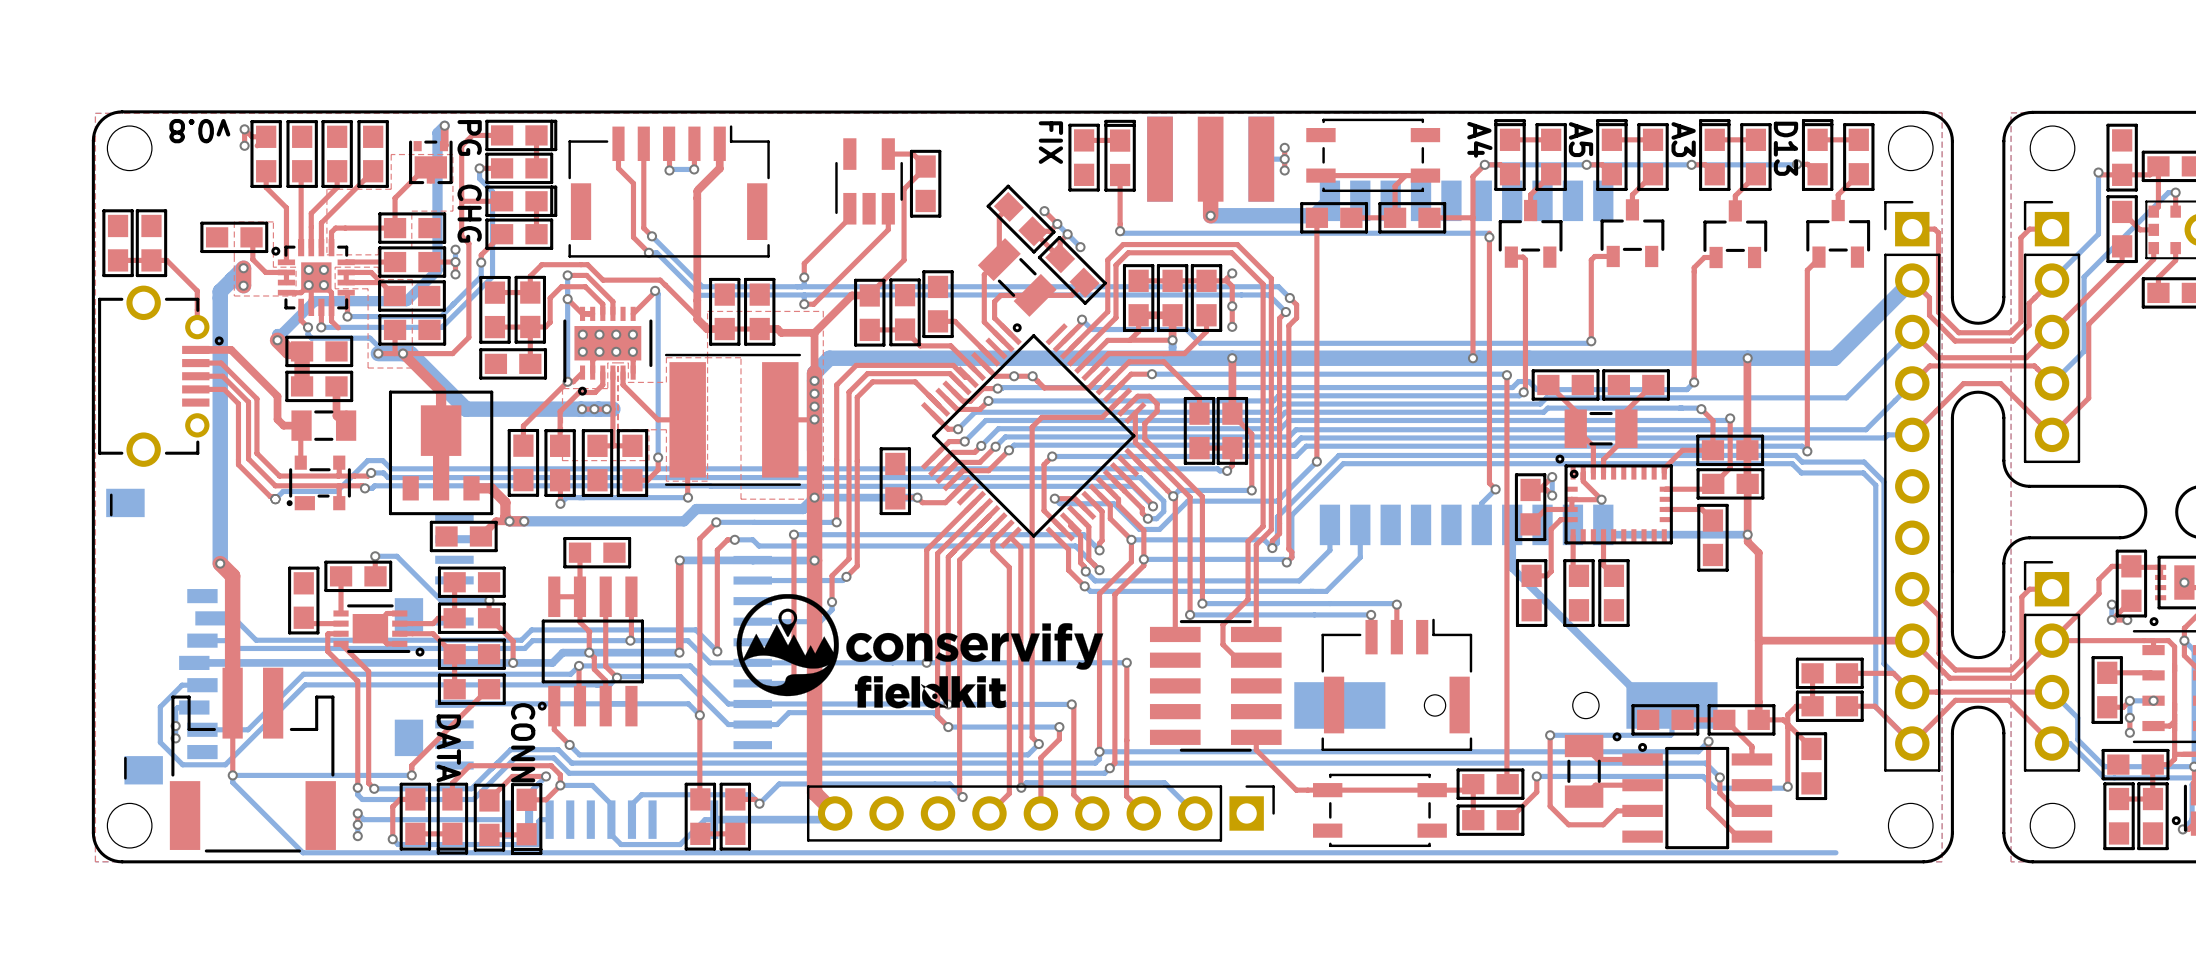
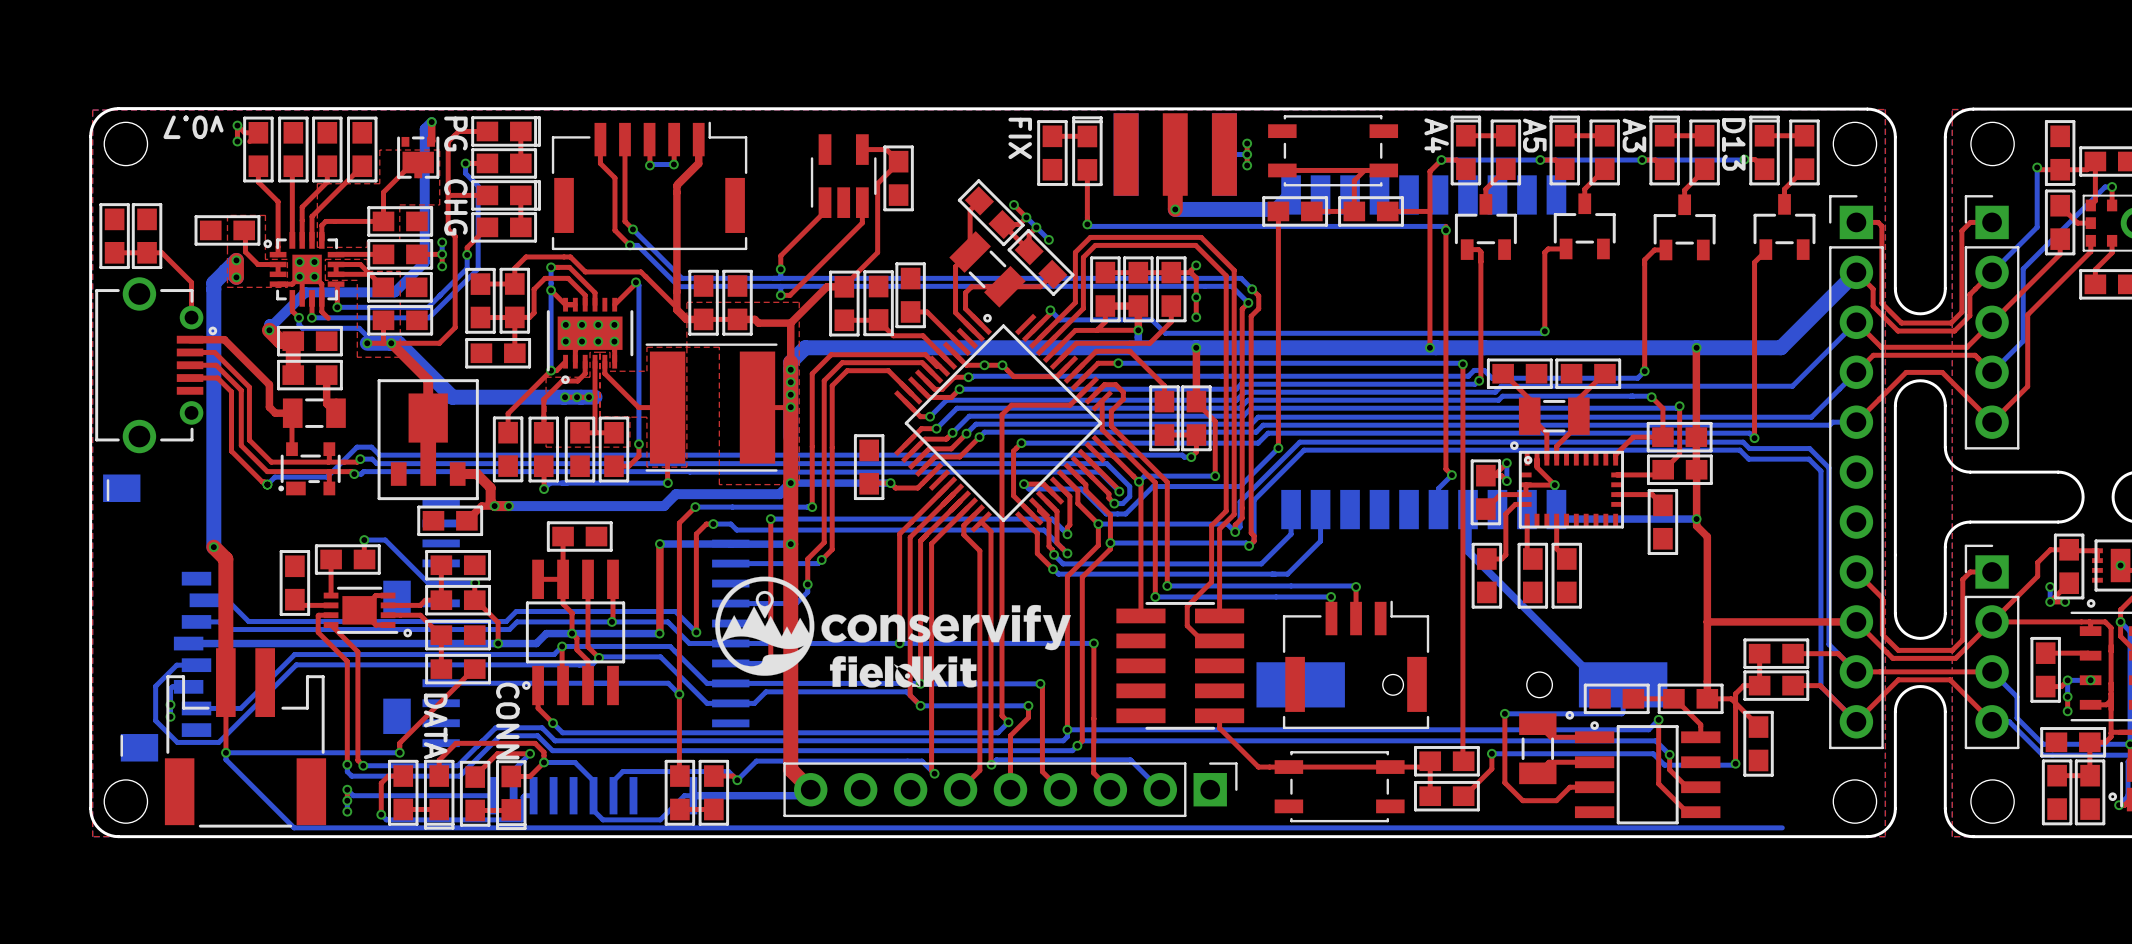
text: v0.8 (199, 131) -> v0.7 (193, 127)

